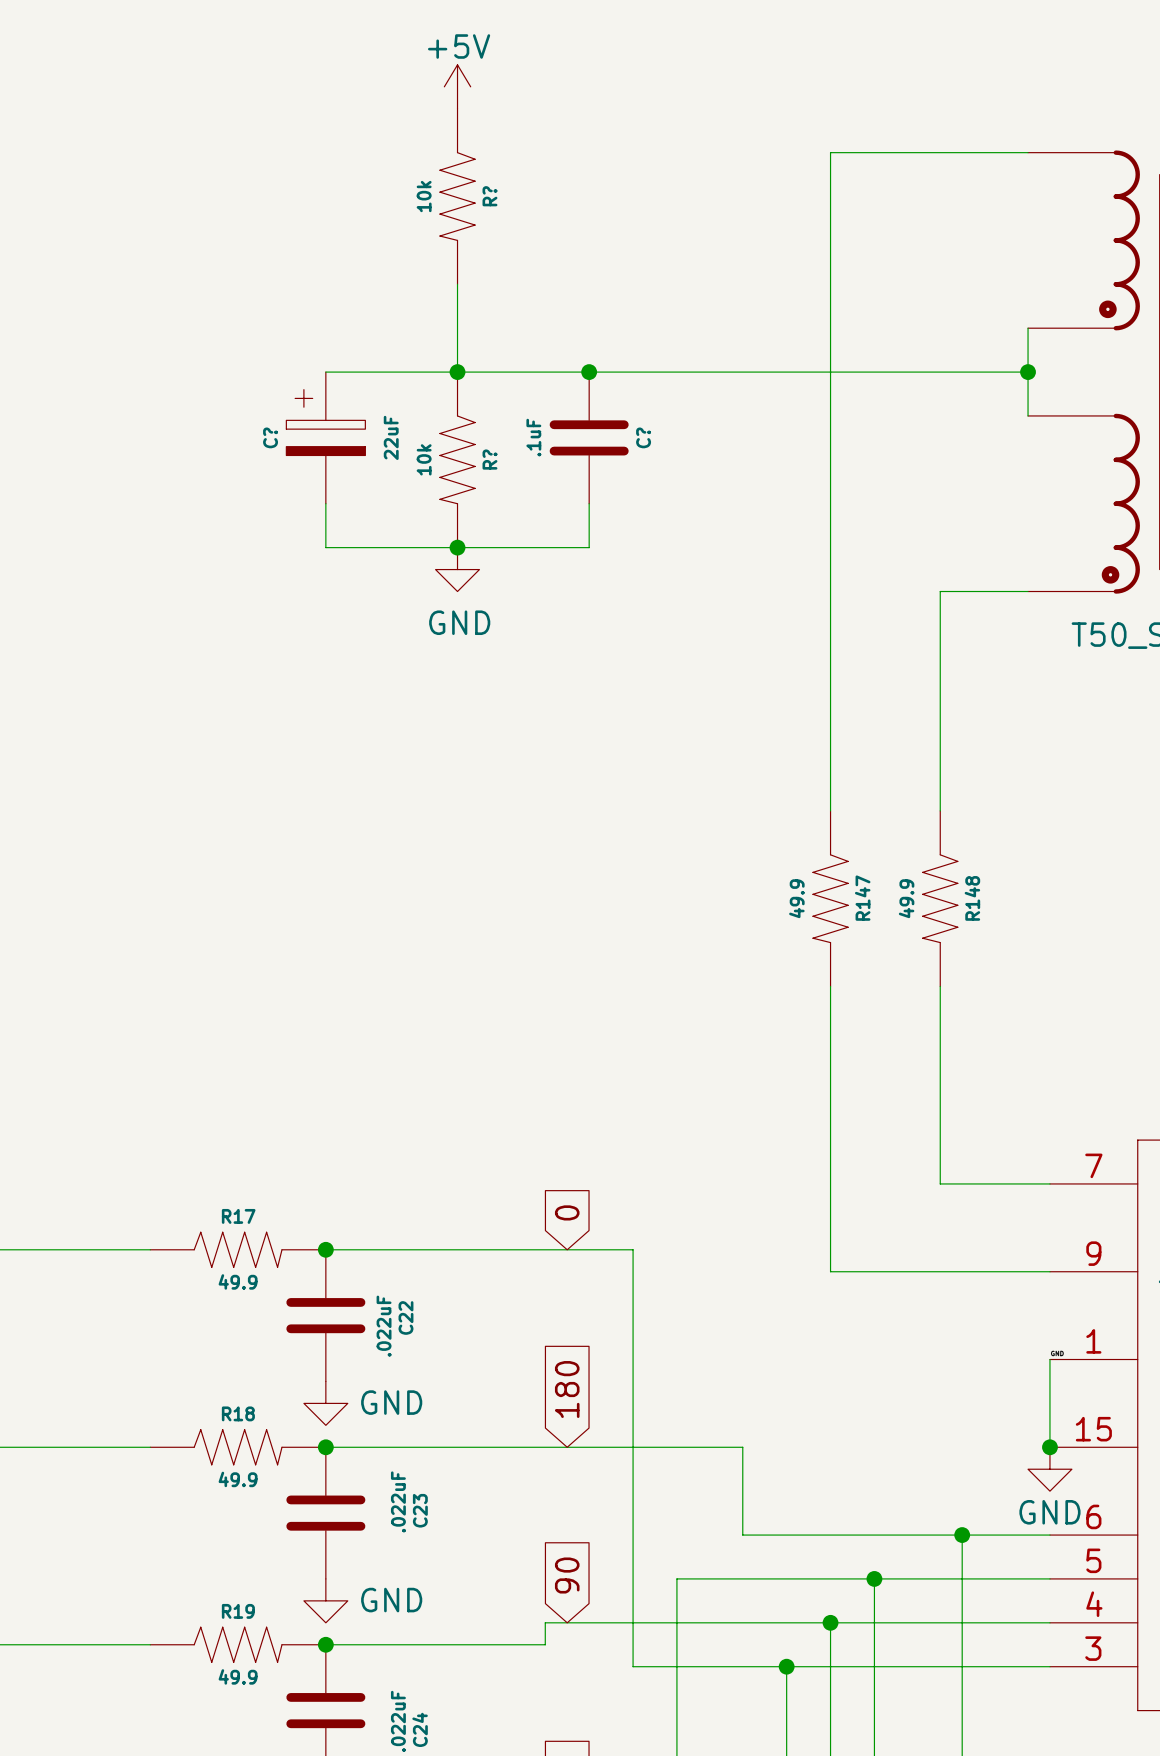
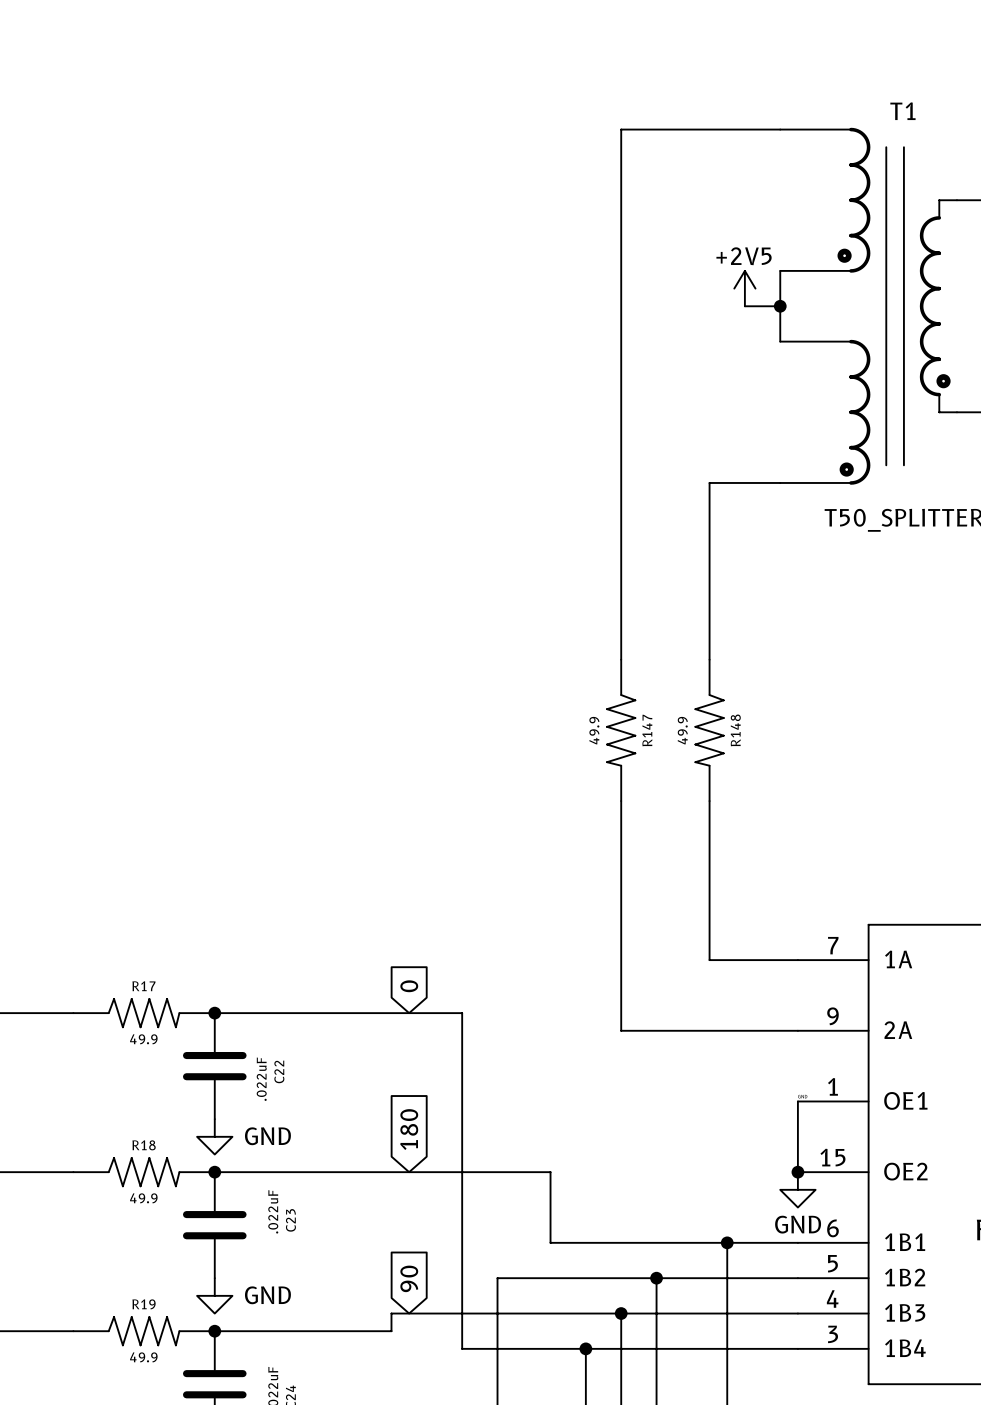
power symbol: +5V (457, 86) -> none
R?: 10k (457, 196) -> none
wire: (457, 284) (457, 372) -> none
power symbol: none -> +2V5 (744, 288)
wire: (325, 372) (984, 372) -> none
junction: (457, 372) -> none
junction: (589, 372) -> none
C?: 22uF (325, 437) -> none
C?: .1uF (589, 437) -> none
R?: 10k (457, 459) -> none
wire: (325, 503) (325, 547) (589, 547) (589, 503) -> none
junction: (457, 547) -> none
power symbol: GND (457, 569) -> none

